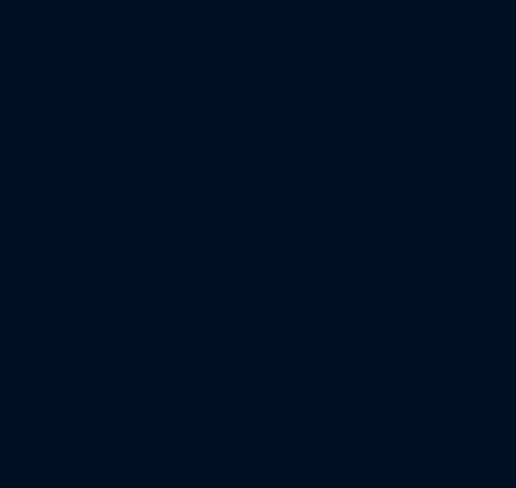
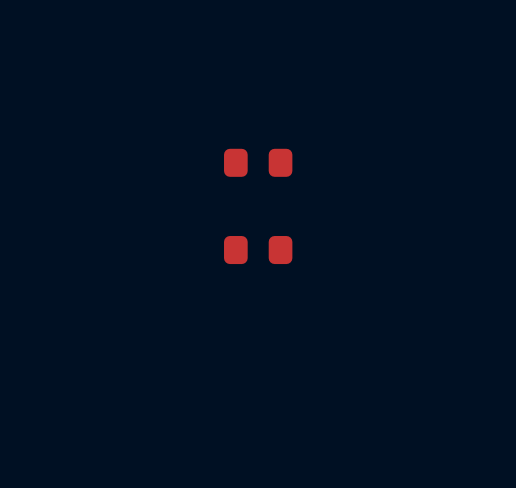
part: none -> (258, 162)
part: none -> (258, 250)

